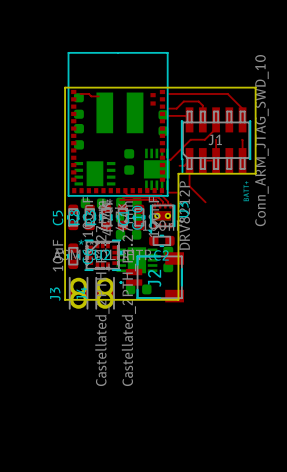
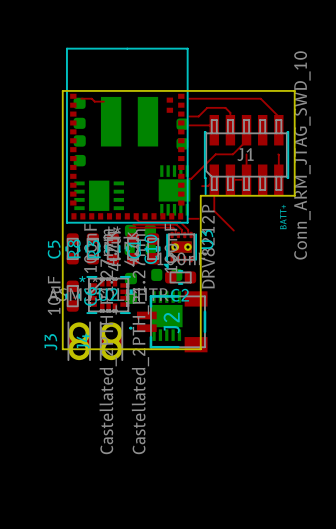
part: (129, 161) -> none
part: (93, 203) -> none
part rotation: 0° (128, 234) -> 90° clockwise (130, 288)
part position: (128, 234) -> (130, 288)
part rotation: 0° (168, 259) -> 90° clockwise (166, 274)
part position: (168, 259) -> (166, 274)
part rotation: 0° (136, 260) -> 90° clockwise (166, 316)
part: (138, 289) -> none

